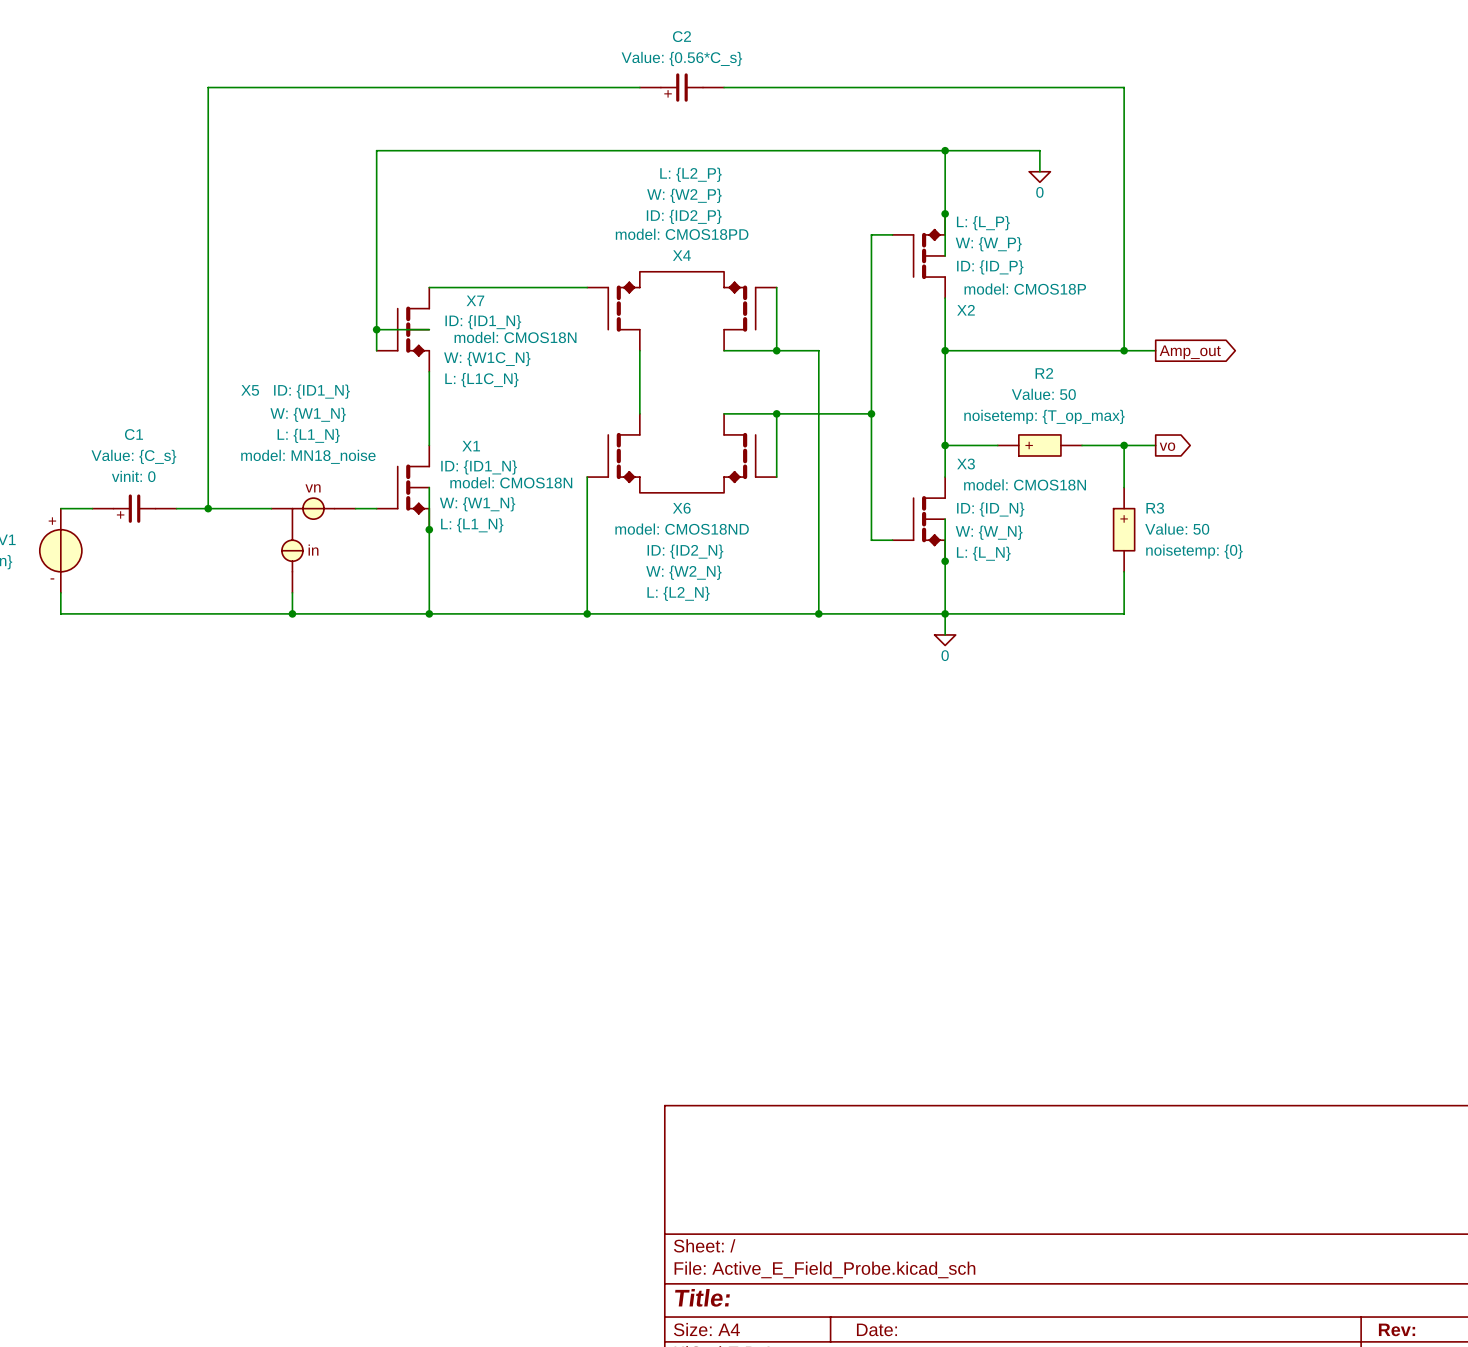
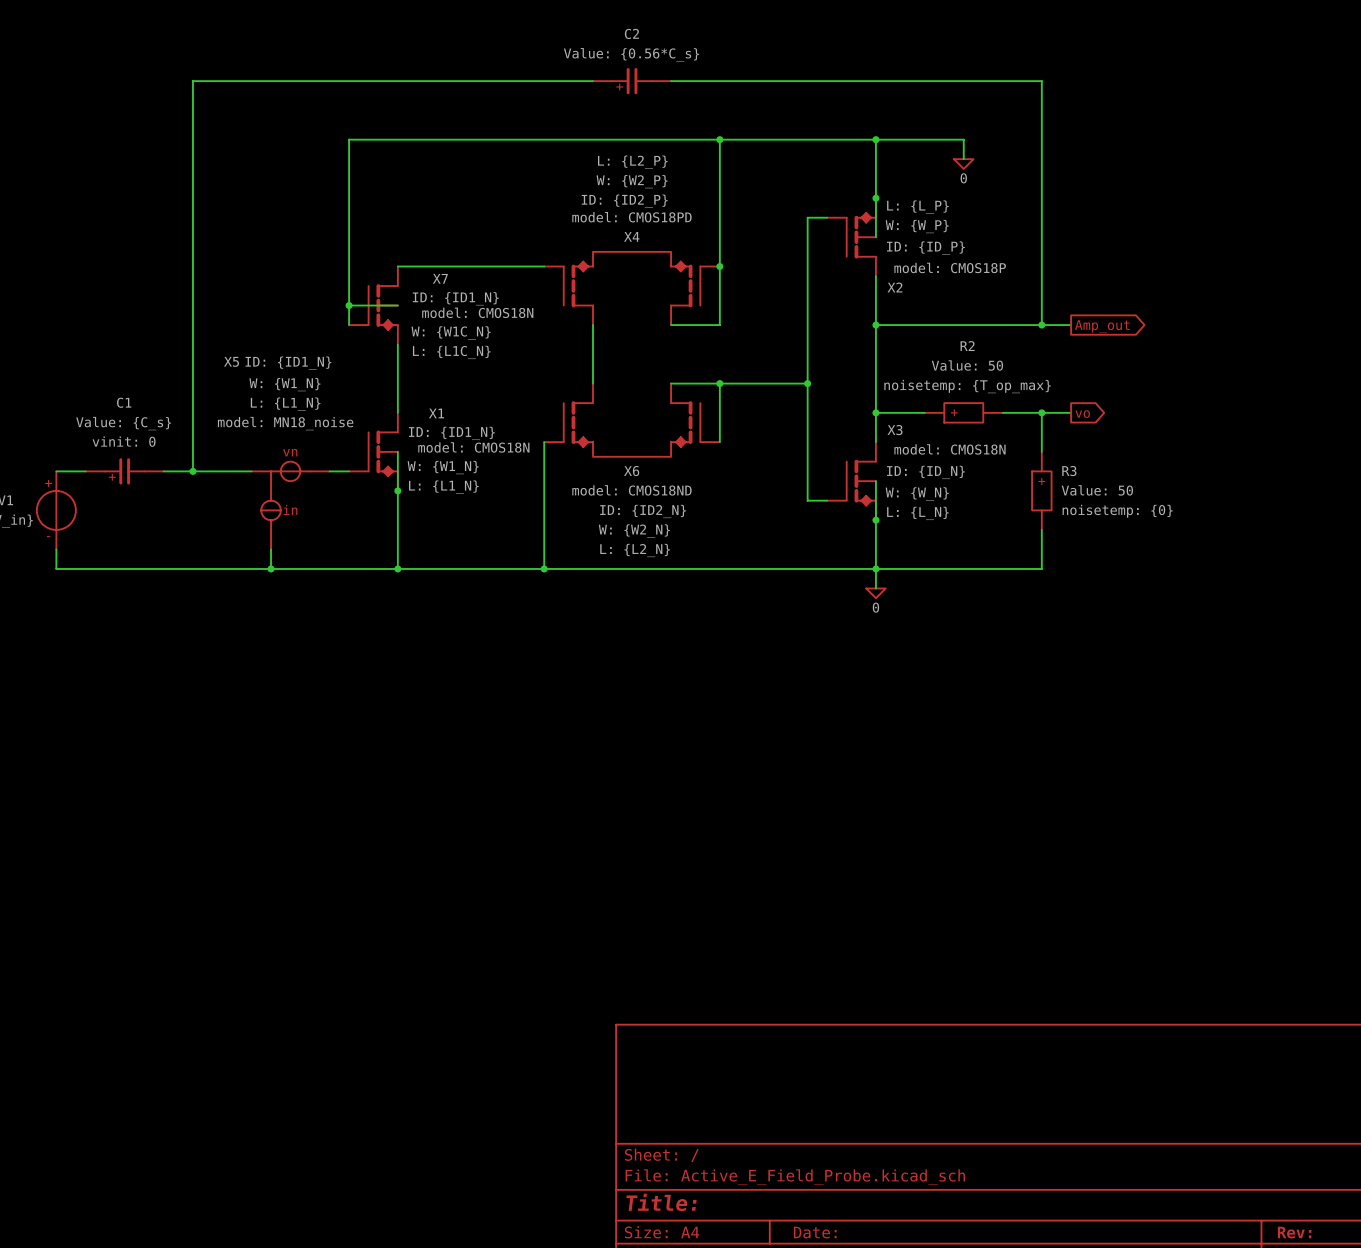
wire: none -> (719, 139) (719, 266)
junction: none -> (719, 139)
junction: none -> (719, 266)
wire: (776, 350) (818, 350) (818, 613) -> none
junction: (776, 350) -> none
junction: (818, 613) -> none

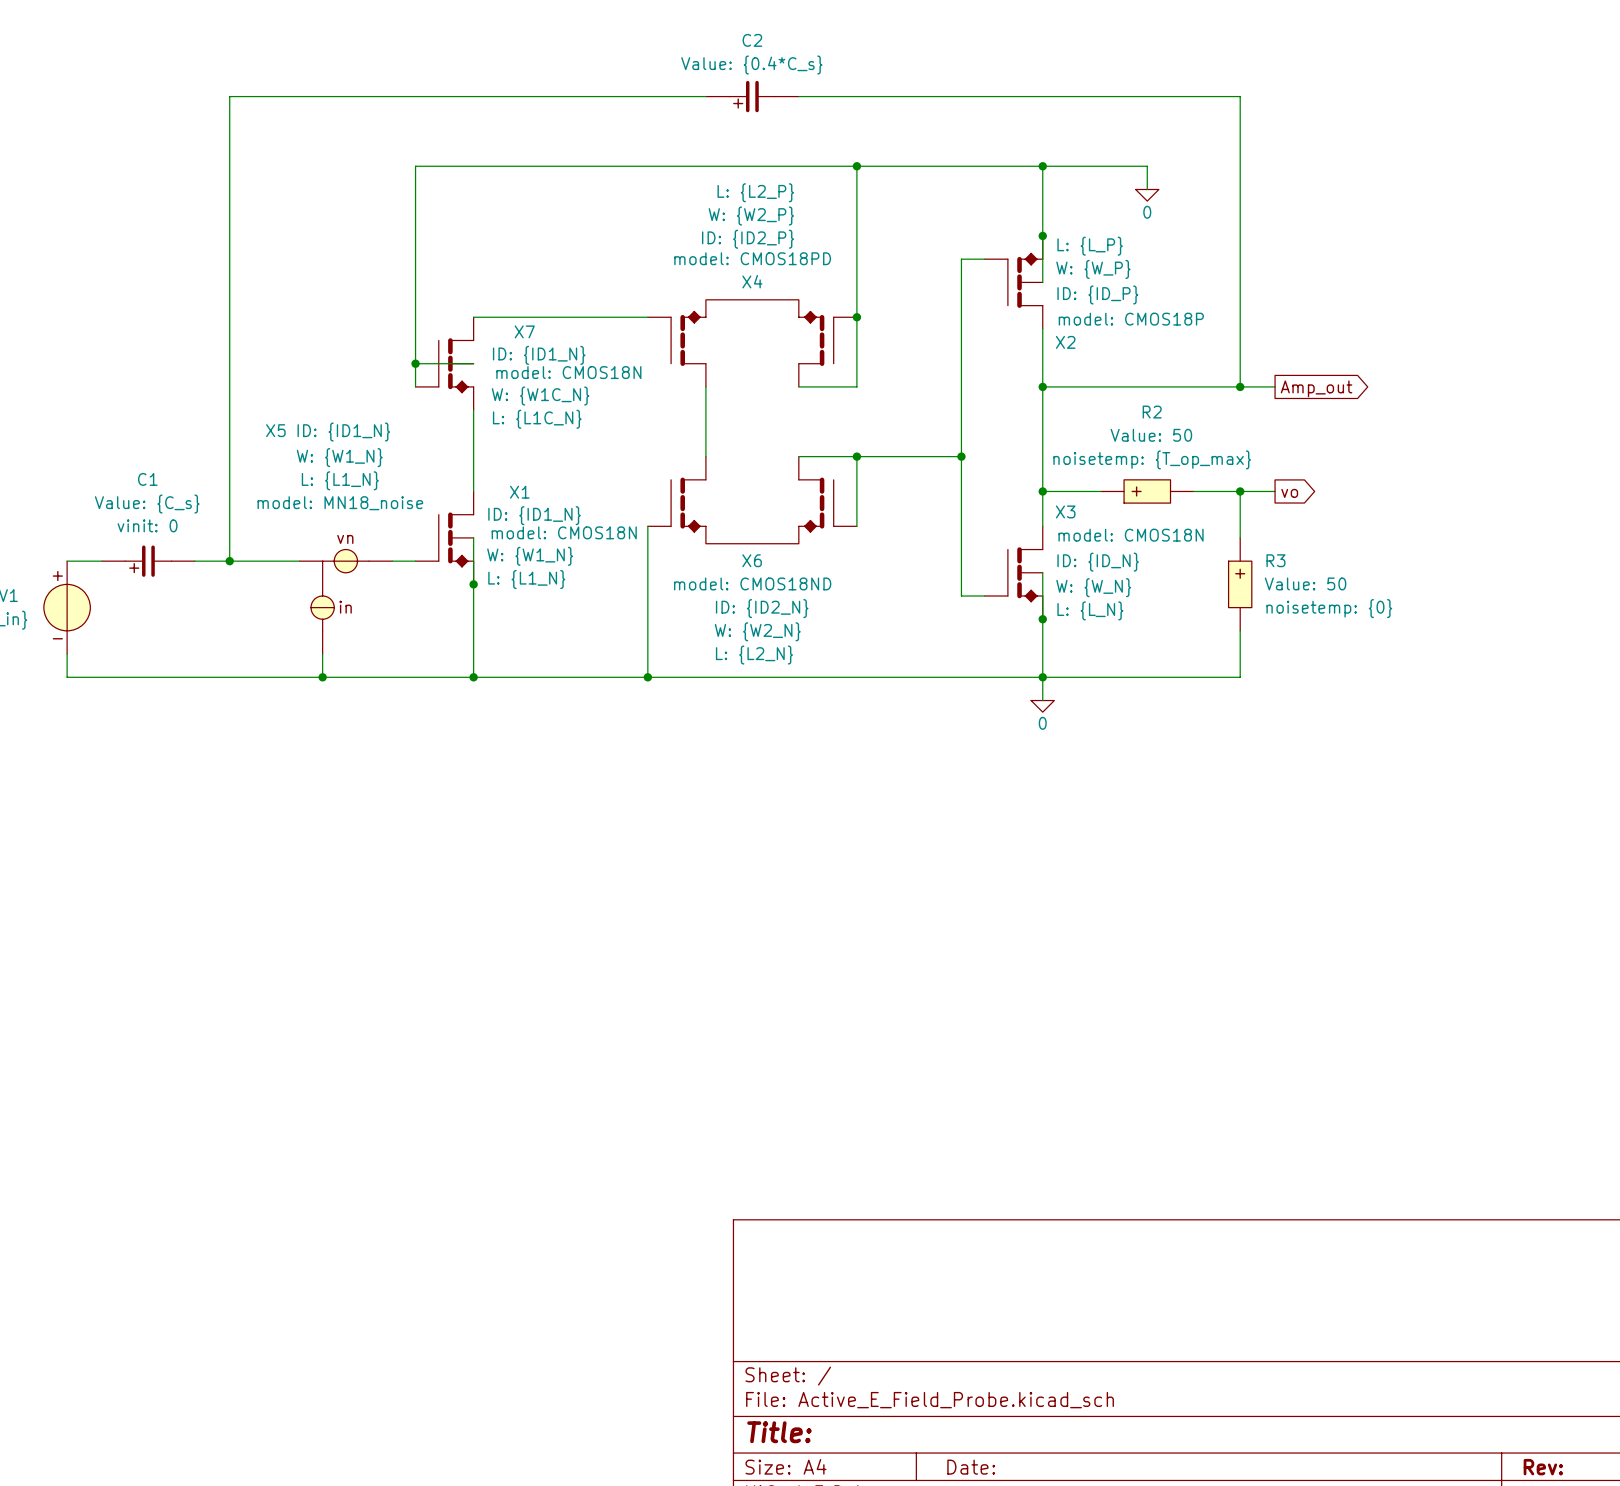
C2 value: Value: {0.56*C_s} (631, 54) -> Value: {0.4*C_s} (751, 65)

